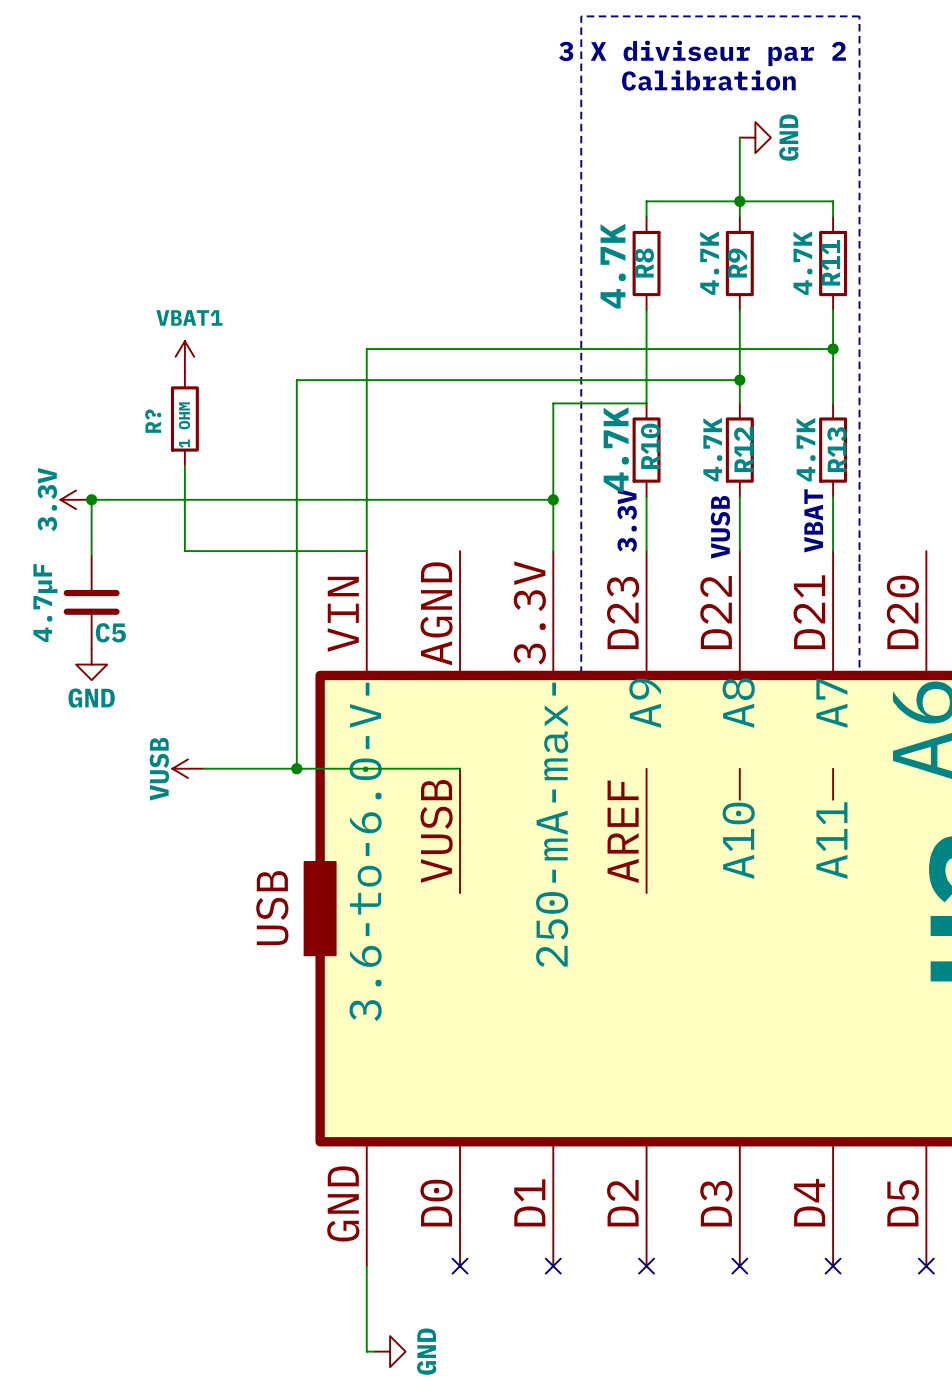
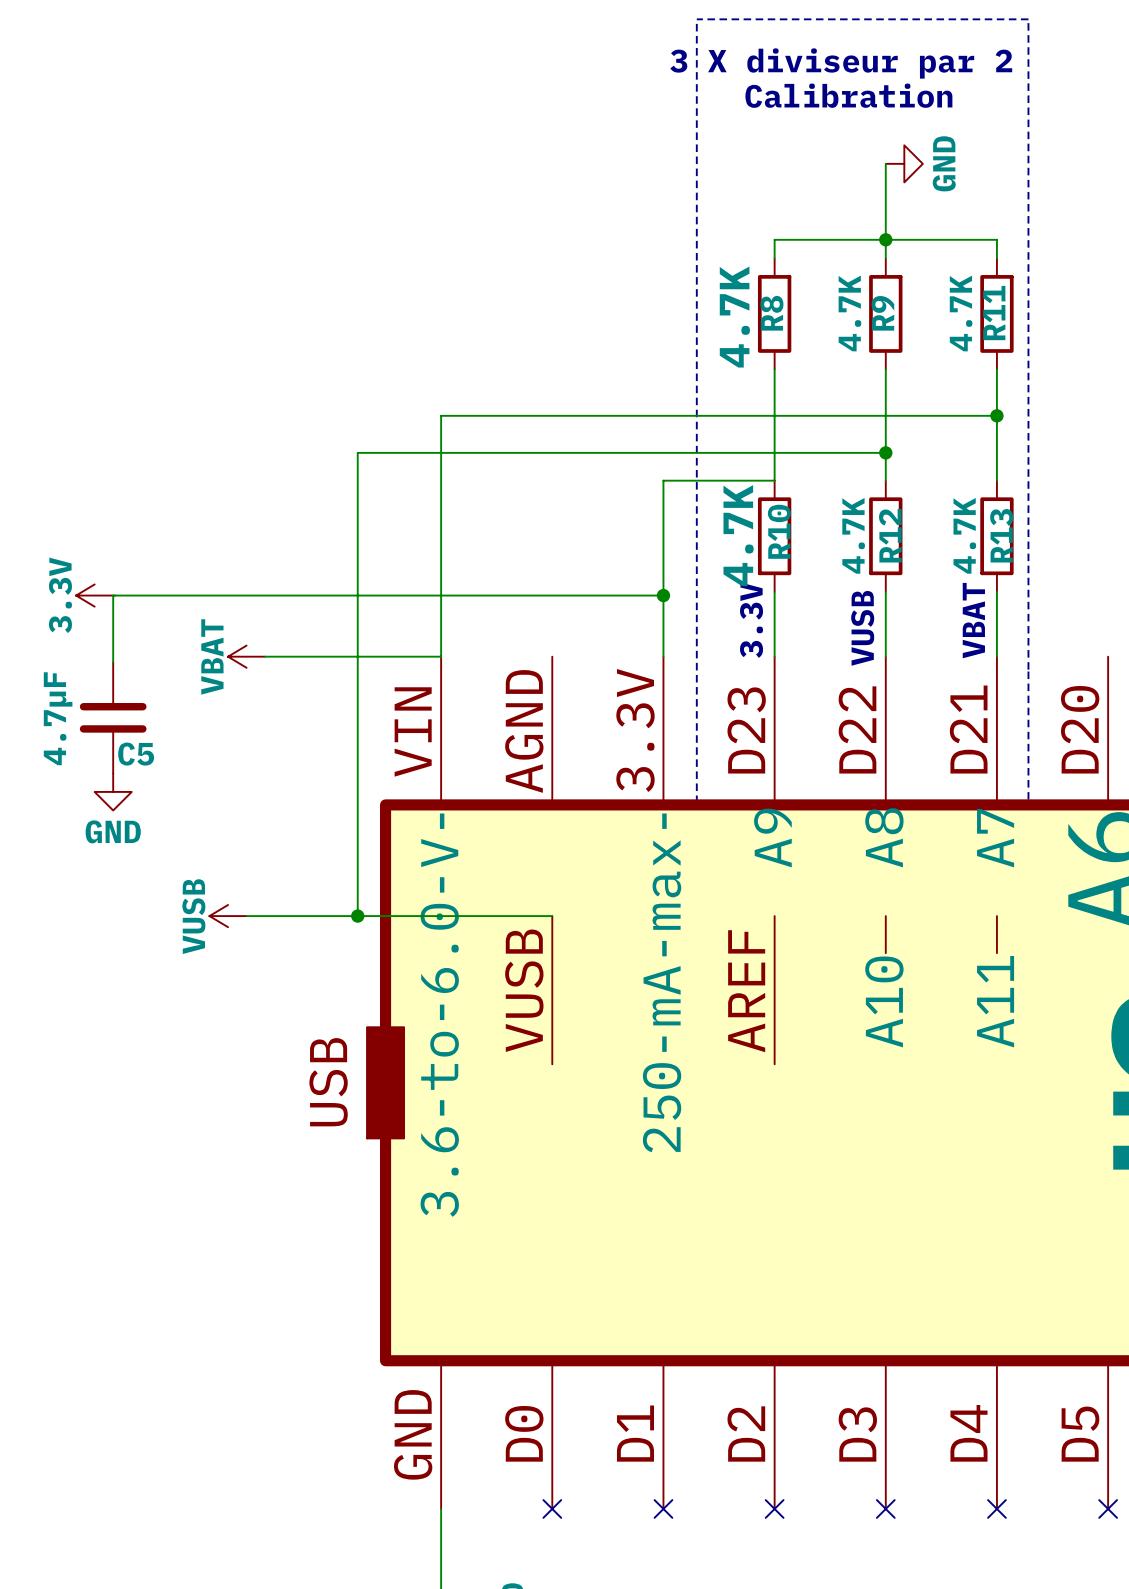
power symbol: VBAT1 (184, 356) -> none
R?: 1 OHM (184, 418) -> none
wire: (184, 465) (184, 551) (219, 551) -> none
junction: (91, 499) -> none
power symbol: none -> VBAT (246, 656)

